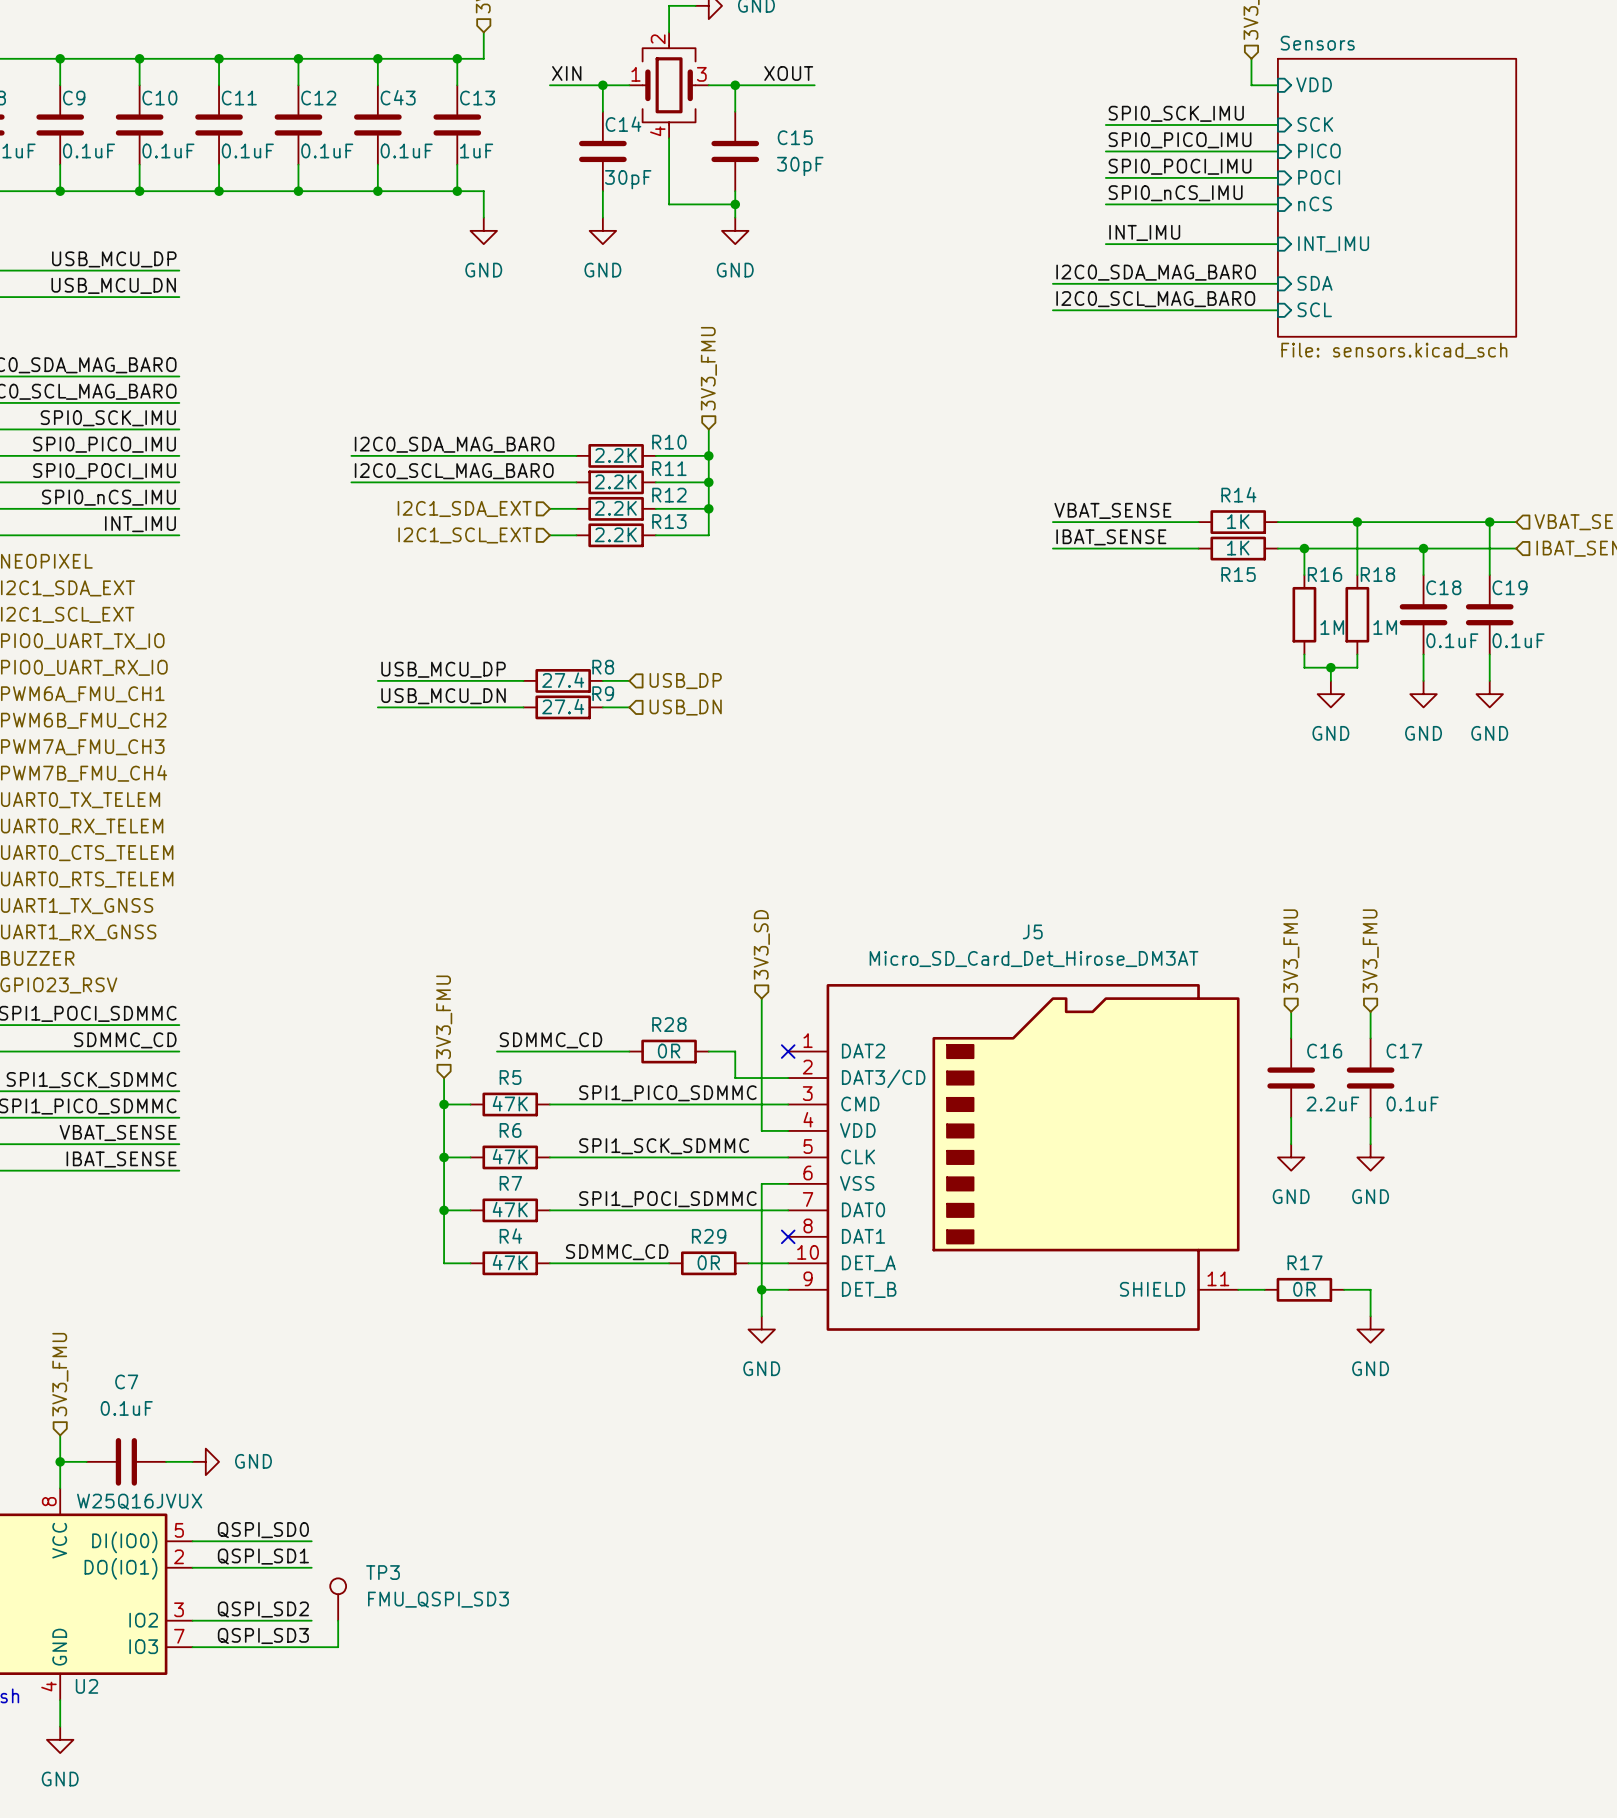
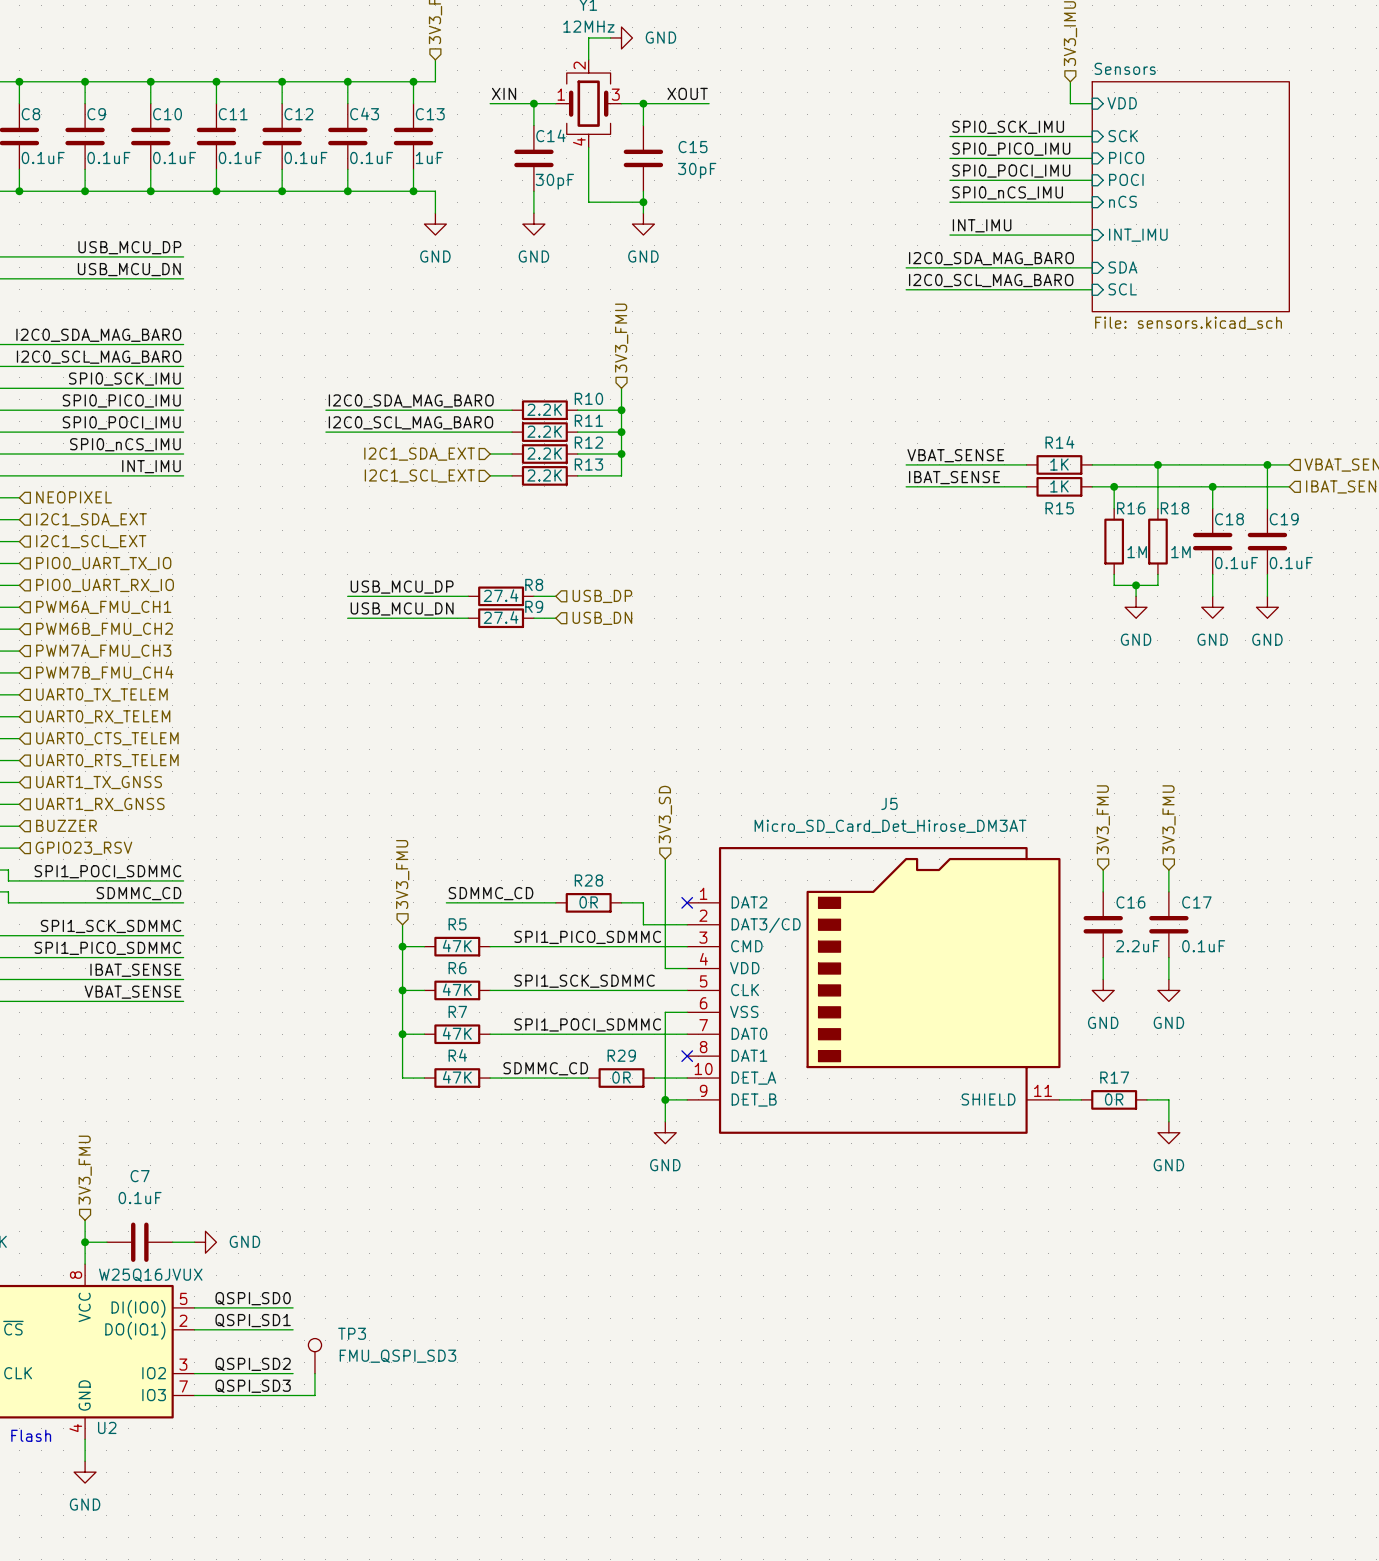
label: VBAT_SENSE (118, 1133) -> IBAT_SENSE (135, 970)
label: IBAT_SENSE (121, 1159) -> VBAT_SENSE (132, 992)

